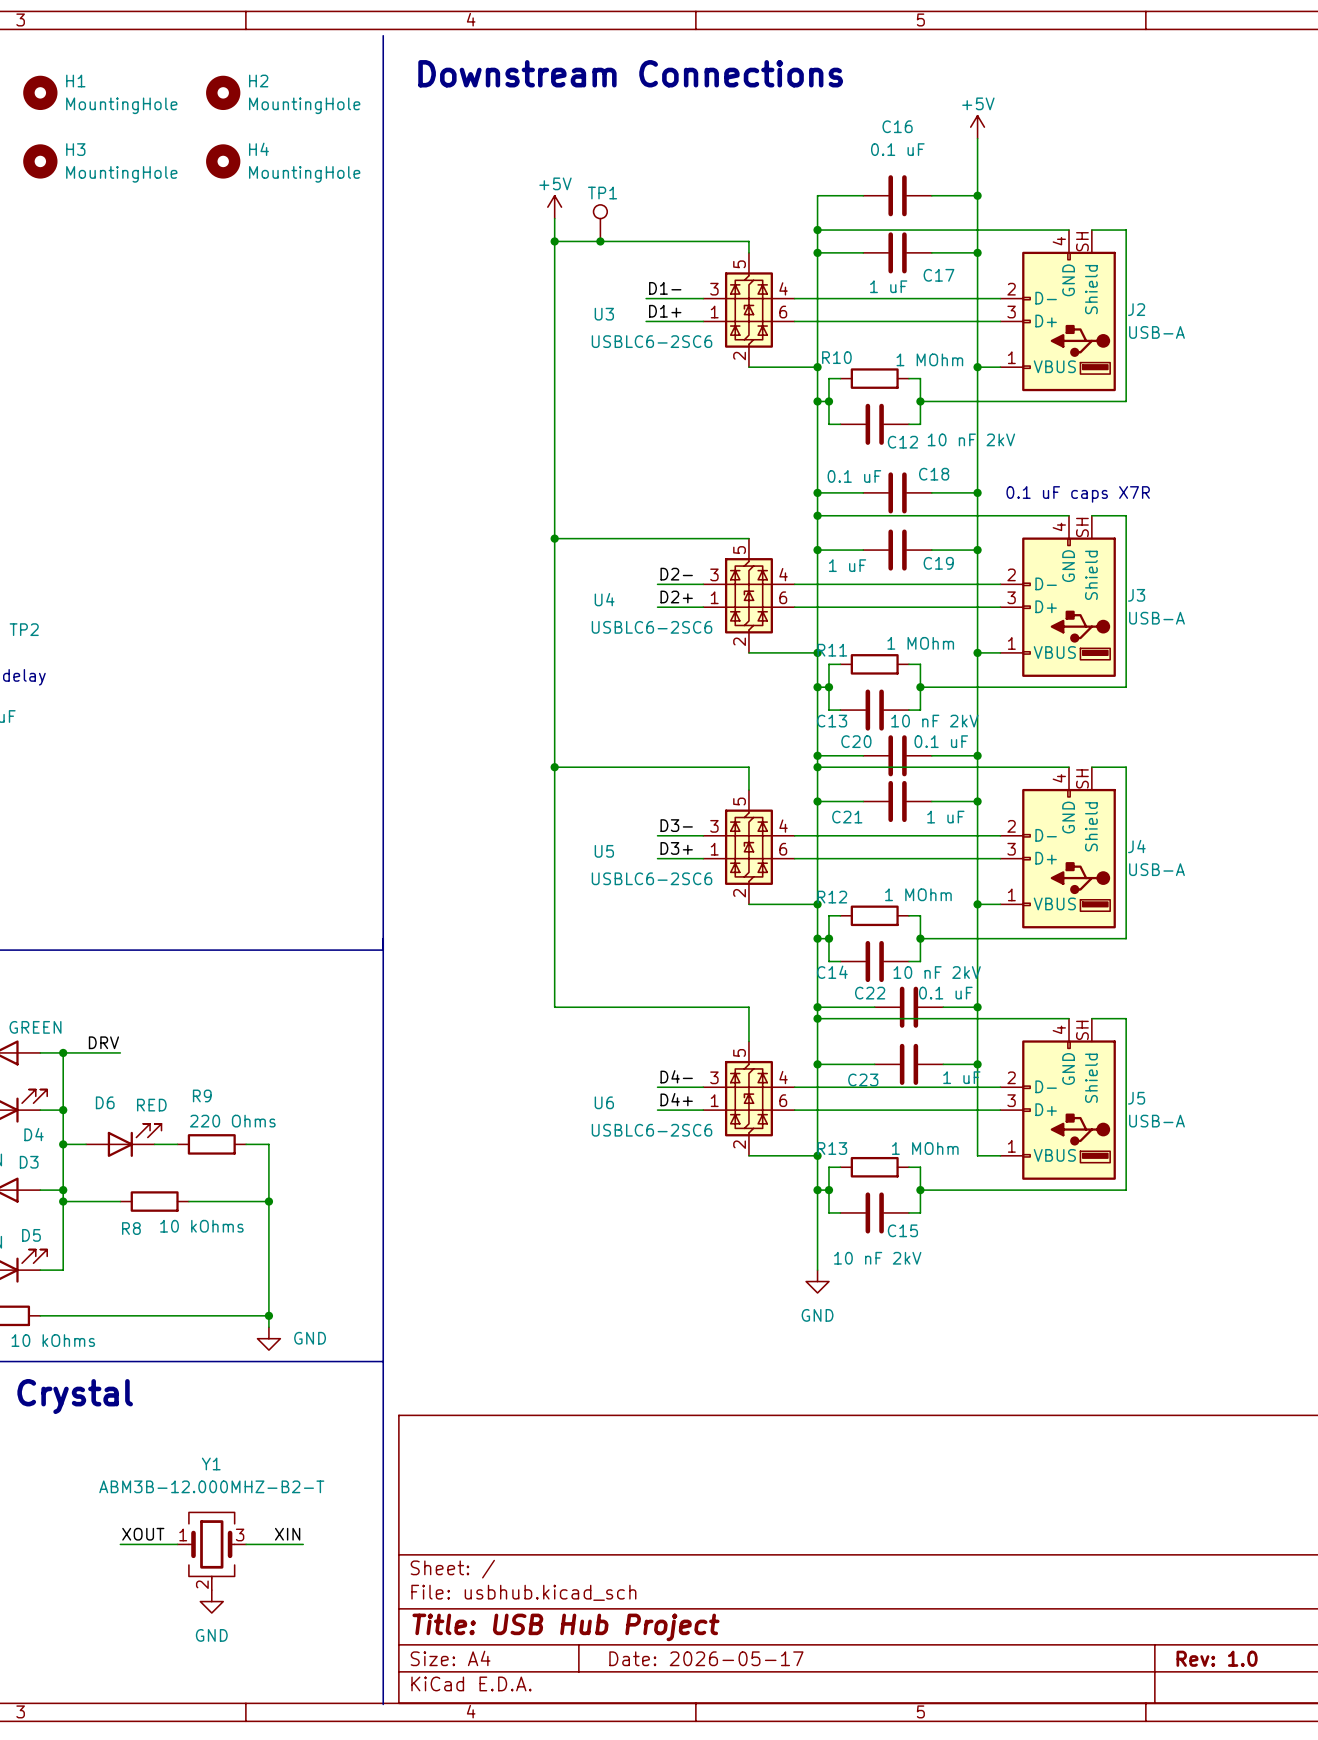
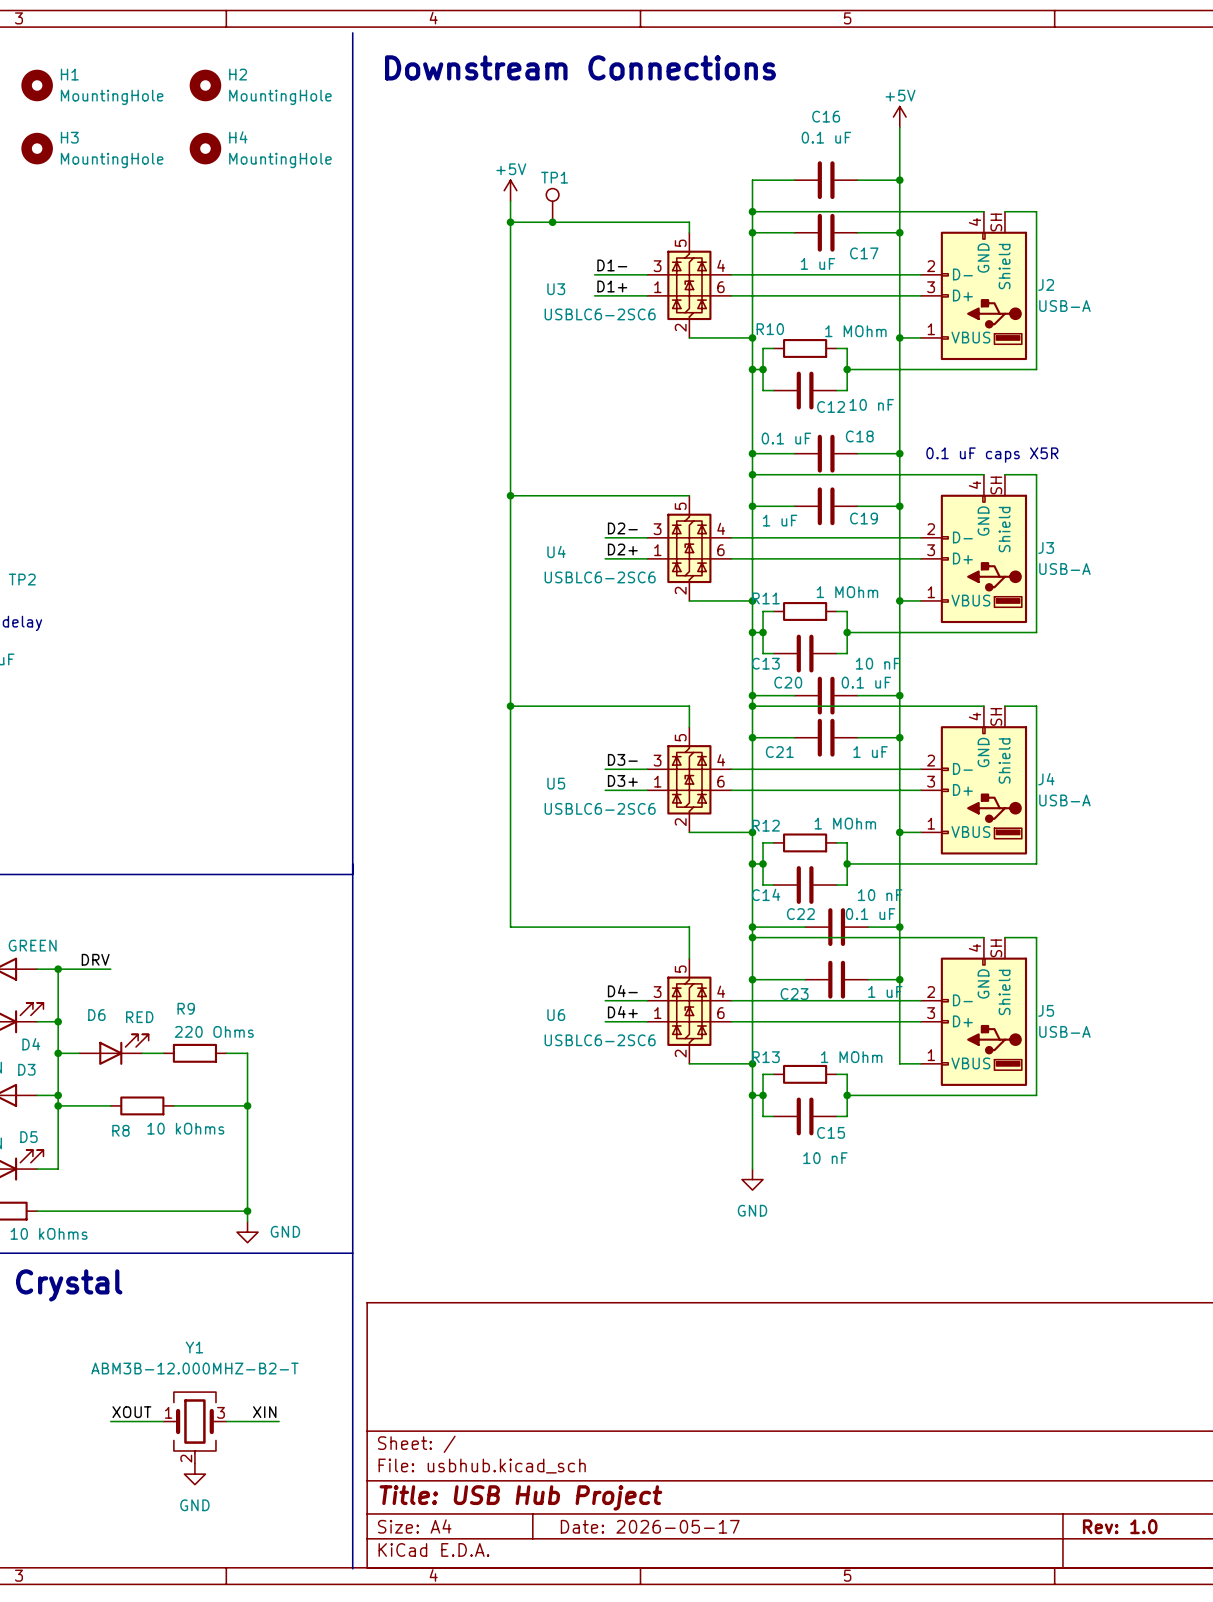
C12 value: 10 nF 2kV (971, 439) -> 10 nF (871, 404)
text: 0.1 uF caps X7R (1078, 494) -> 0.1 uF caps X5R (992, 455)
C13 value: 10 nF 2kV (934, 721) -> 10 nF (878, 663)
C14 value: 10 nF 2kV (937, 972) -> 10 nF (880, 895)
C15 value: 10 nF 2kV (877, 1258) -> 10 nF (825, 1158)

